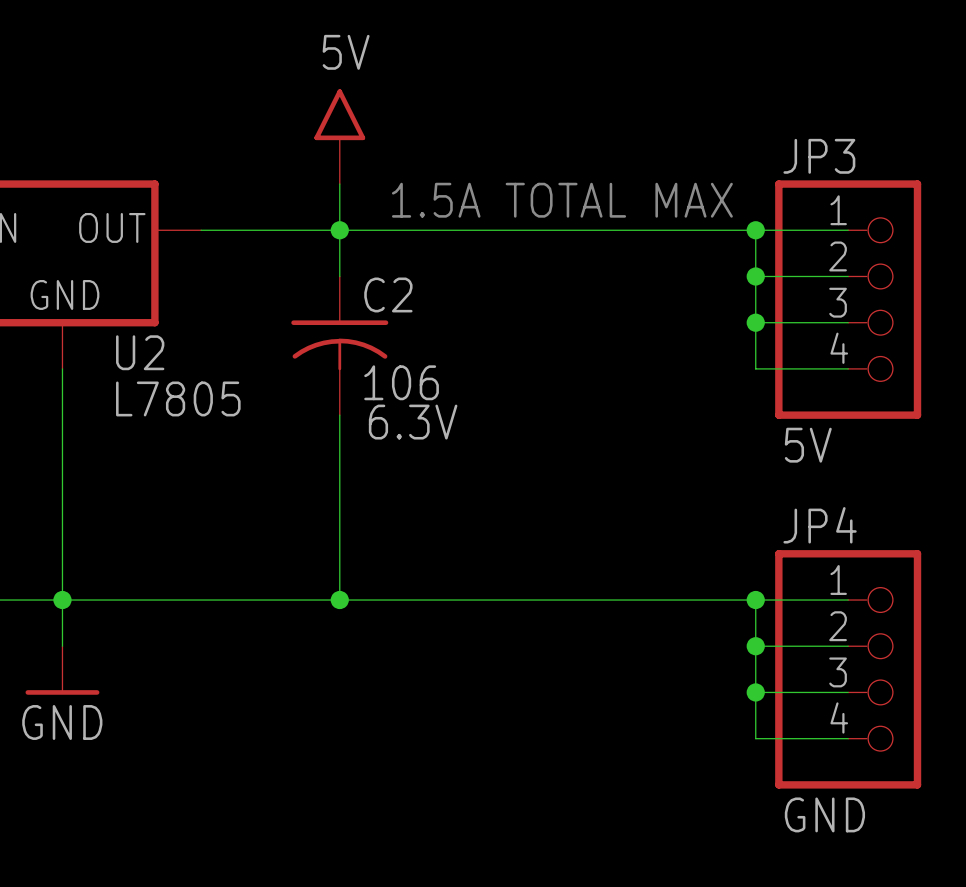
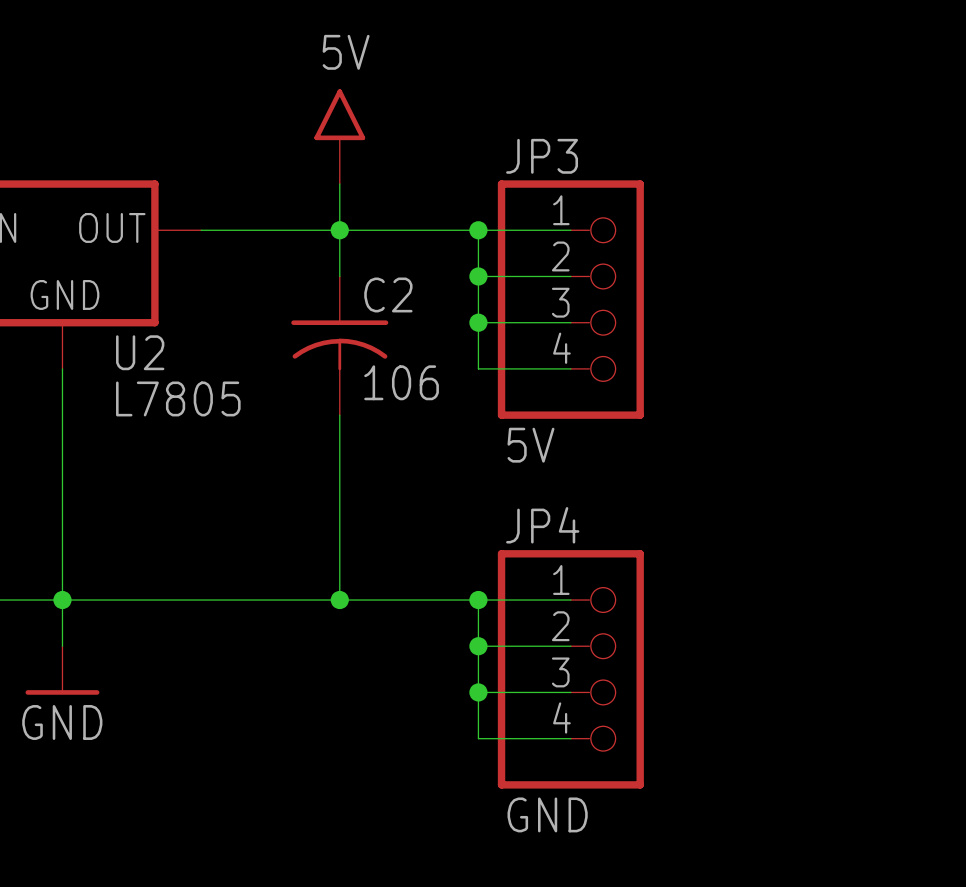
text: 1.5A TOTAL MAX (562, 200) -> none
junction: none -> (478, 230)
wire: (570, 230) (848, 230) -> none
wire: (755, 230) (755, 368) (848, 368) -> (478, 230) (478, 368) (570, 368)
junction: (755, 230) -> none
junction: none -> (478, 276)
wire: (755, 276) (848, 276) -> (478, 276) (570, 276)
junction: (755, 276) -> none
JP3 position: (848, 299) -> (570, 299)
junction: none -> (478, 322)
wire: (755, 322) (848, 322) -> (478, 322) (570, 322)
junction: (755, 322) -> none
C2 text: 6.3V (413, 422) -> none
junction: none -> (478, 600)
wire: (570, 600) (848, 600) -> none
wire: (755, 600) (755, 738) (848, 738) -> (478, 600) (478, 738) (570, 738)
junction: (755, 600) -> none
junction: none -> (478, 646)
wire: (755, 646) (848, 646) -> (478, 646) (570, 646)
junction: (755, 646) -> none
JP4 position: (848, 669) -> (570, 669)
junction: none -> (478, 692)
wire: (755, 692) (848, 692) -> (478, 692) (570, 692)
junction: (755, 692) -> none

